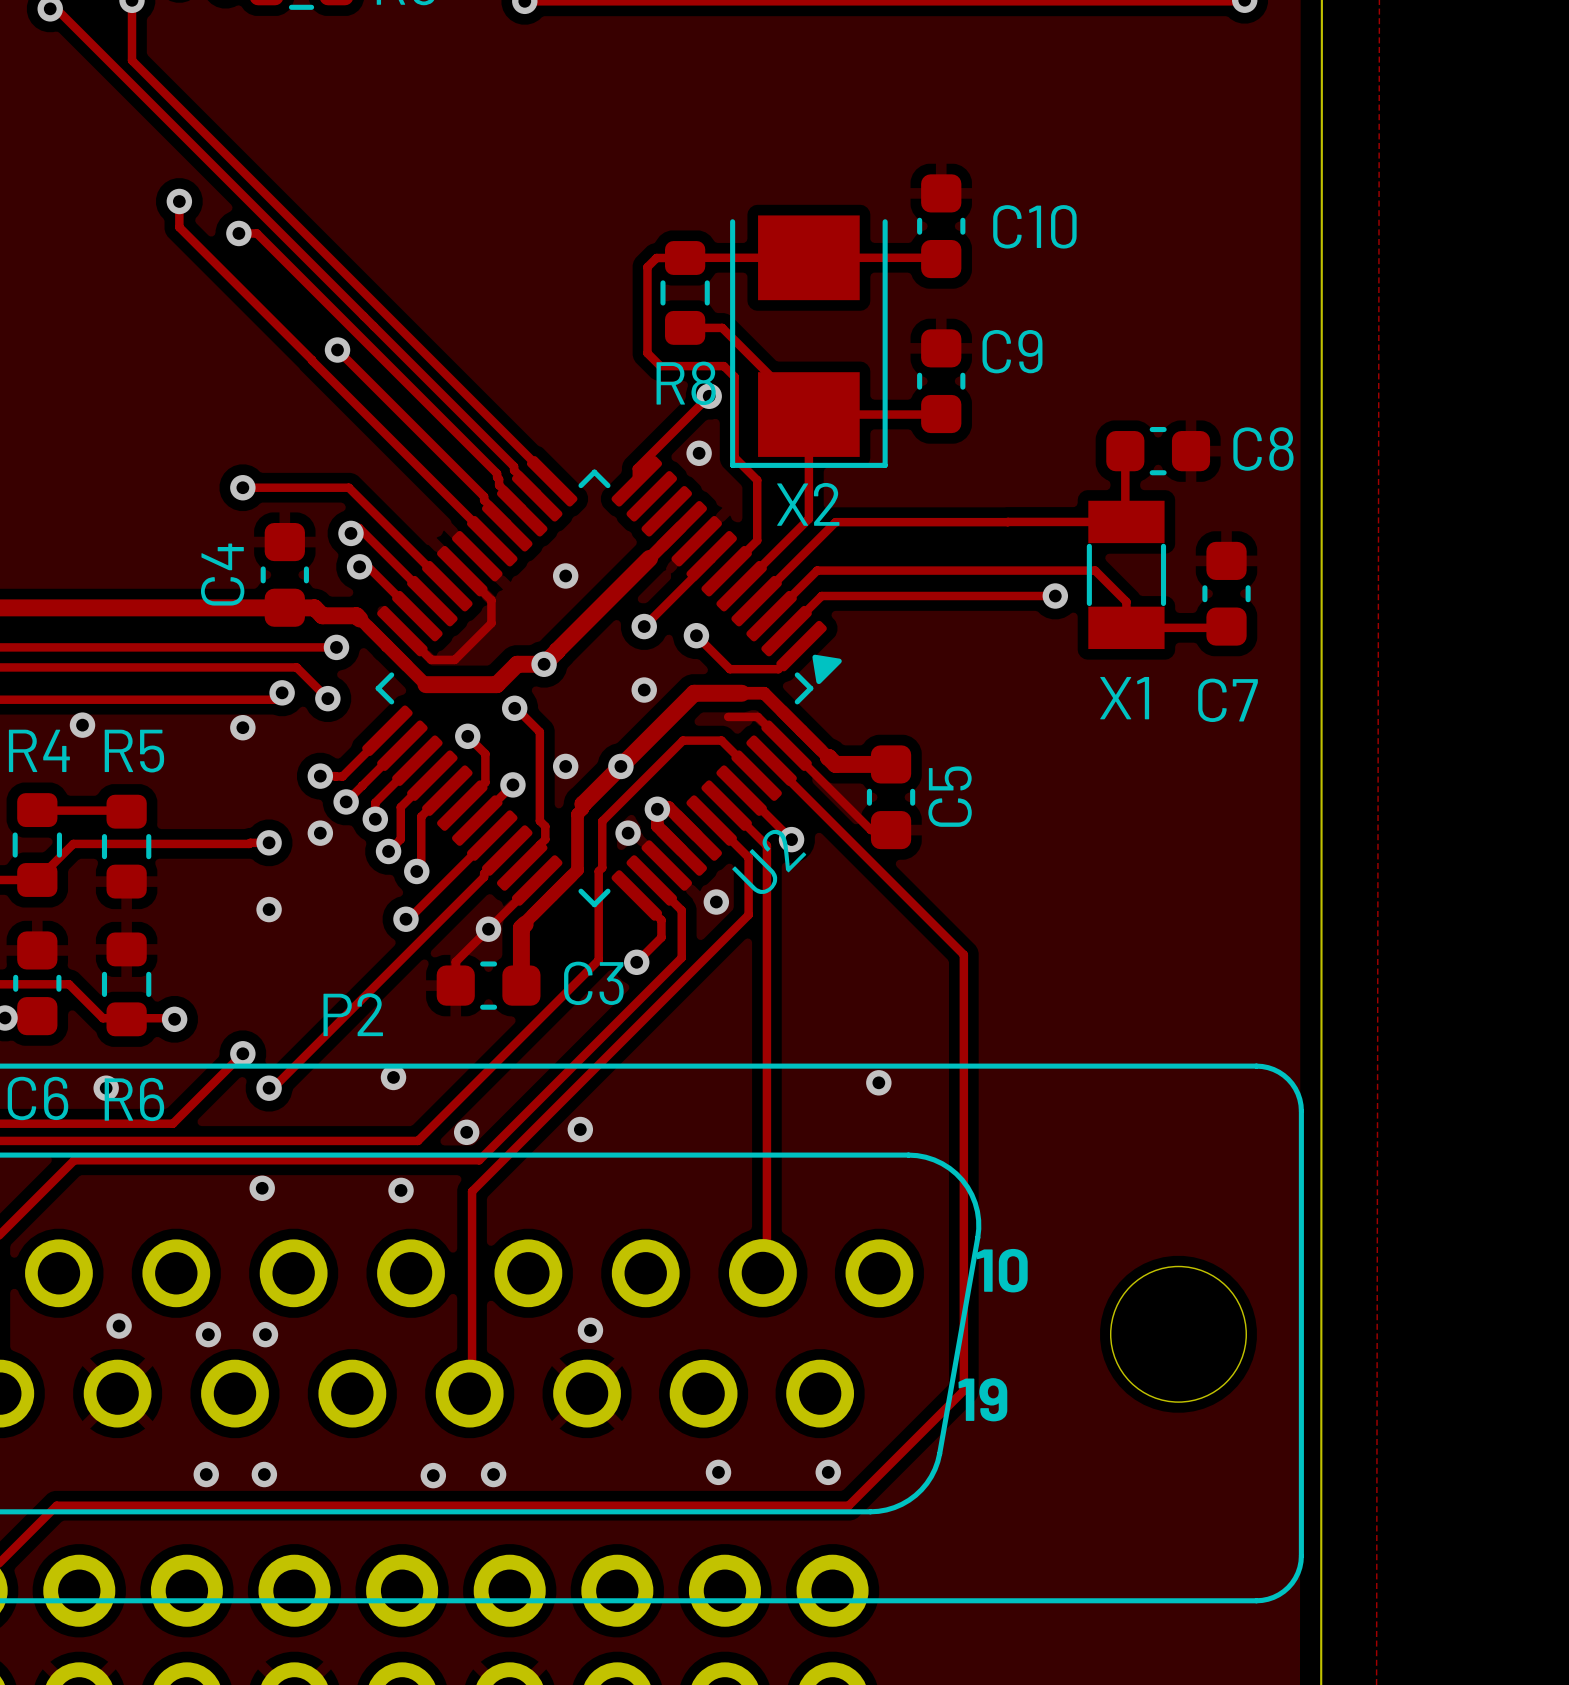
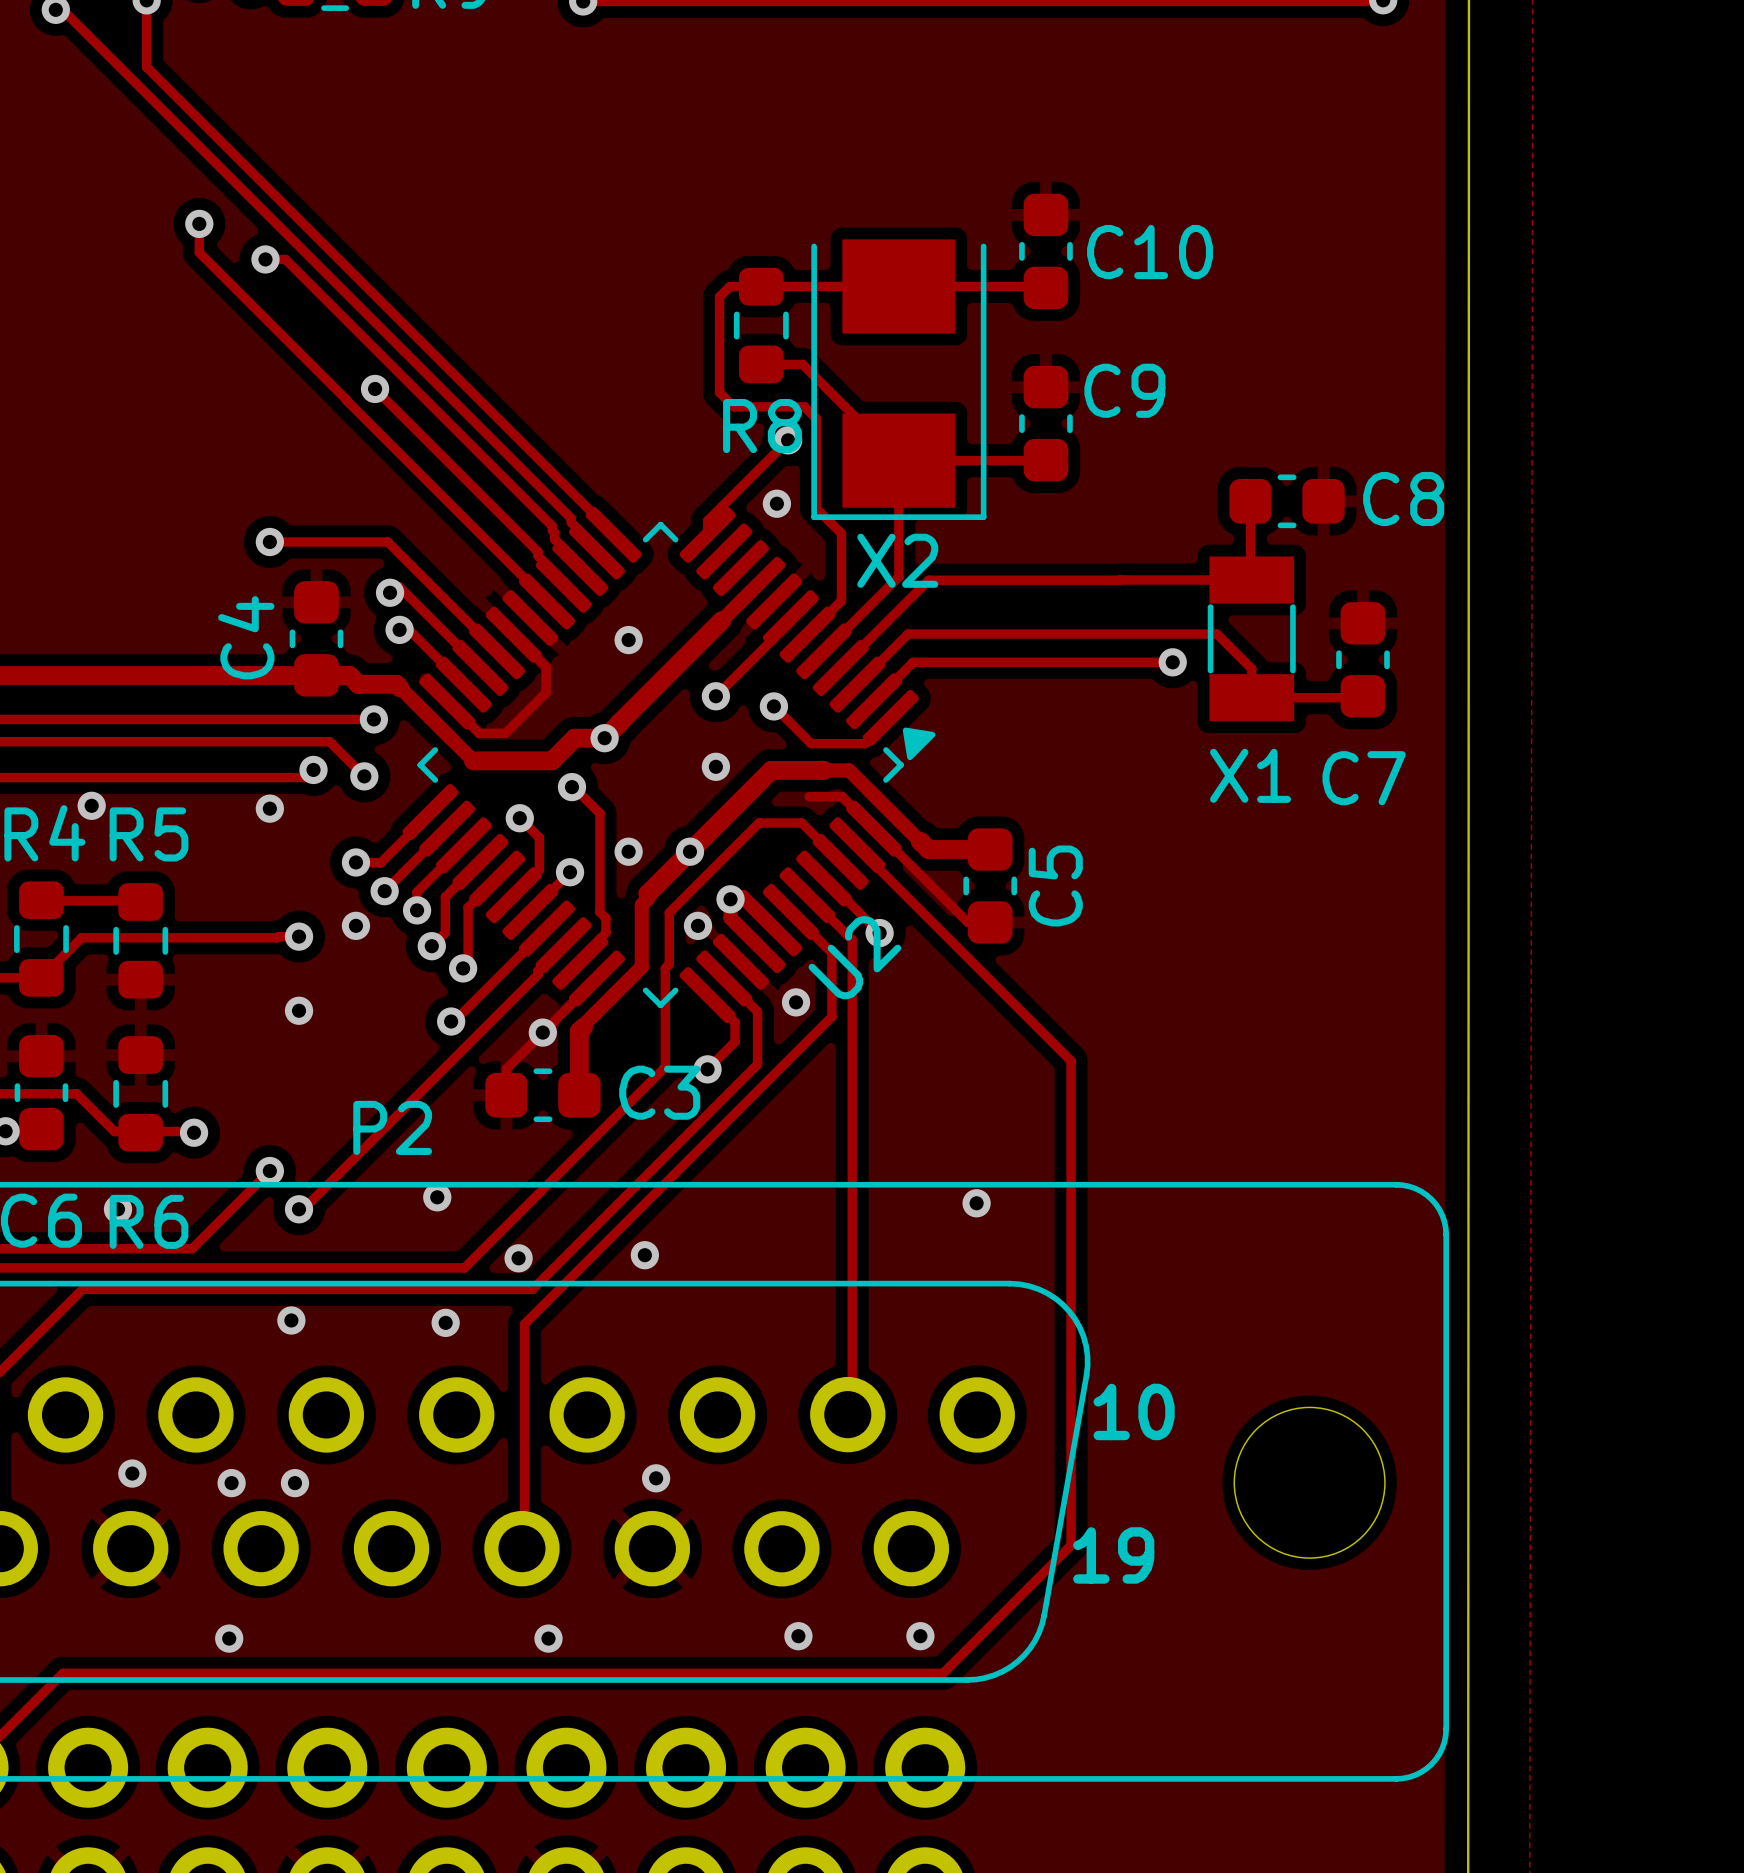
via: (264, 1474) -> none
via: (433, 1475) -> none

